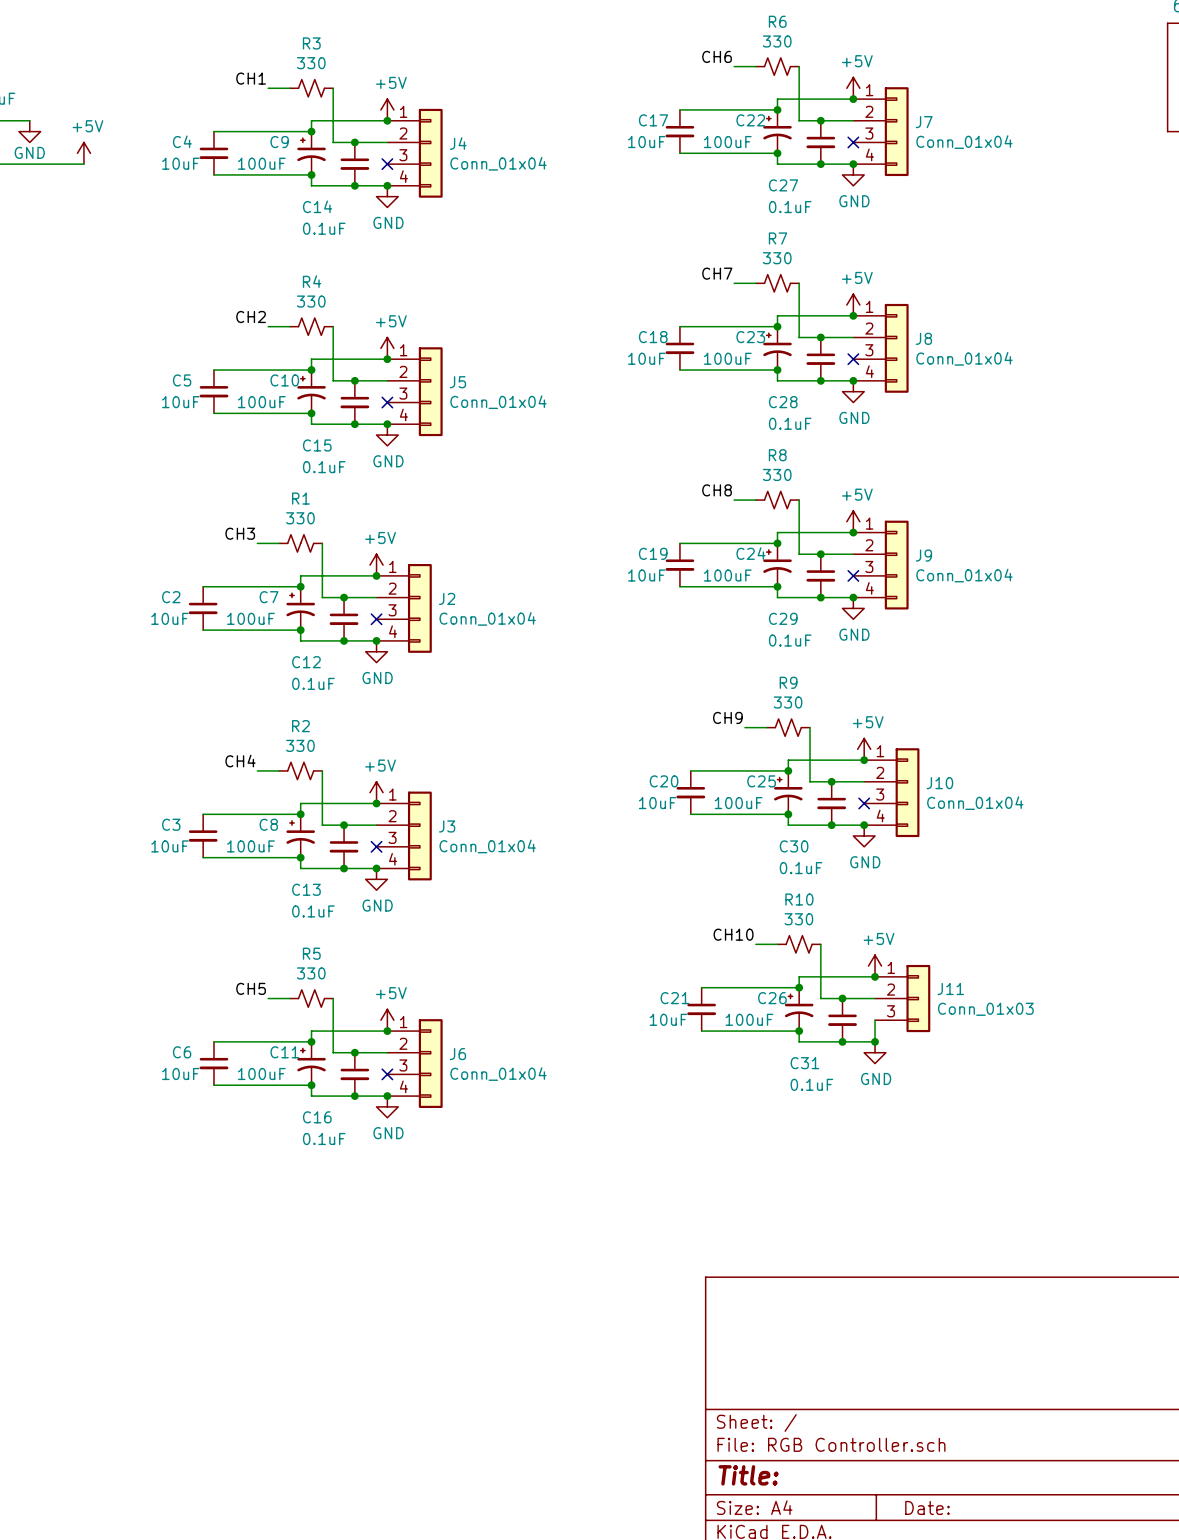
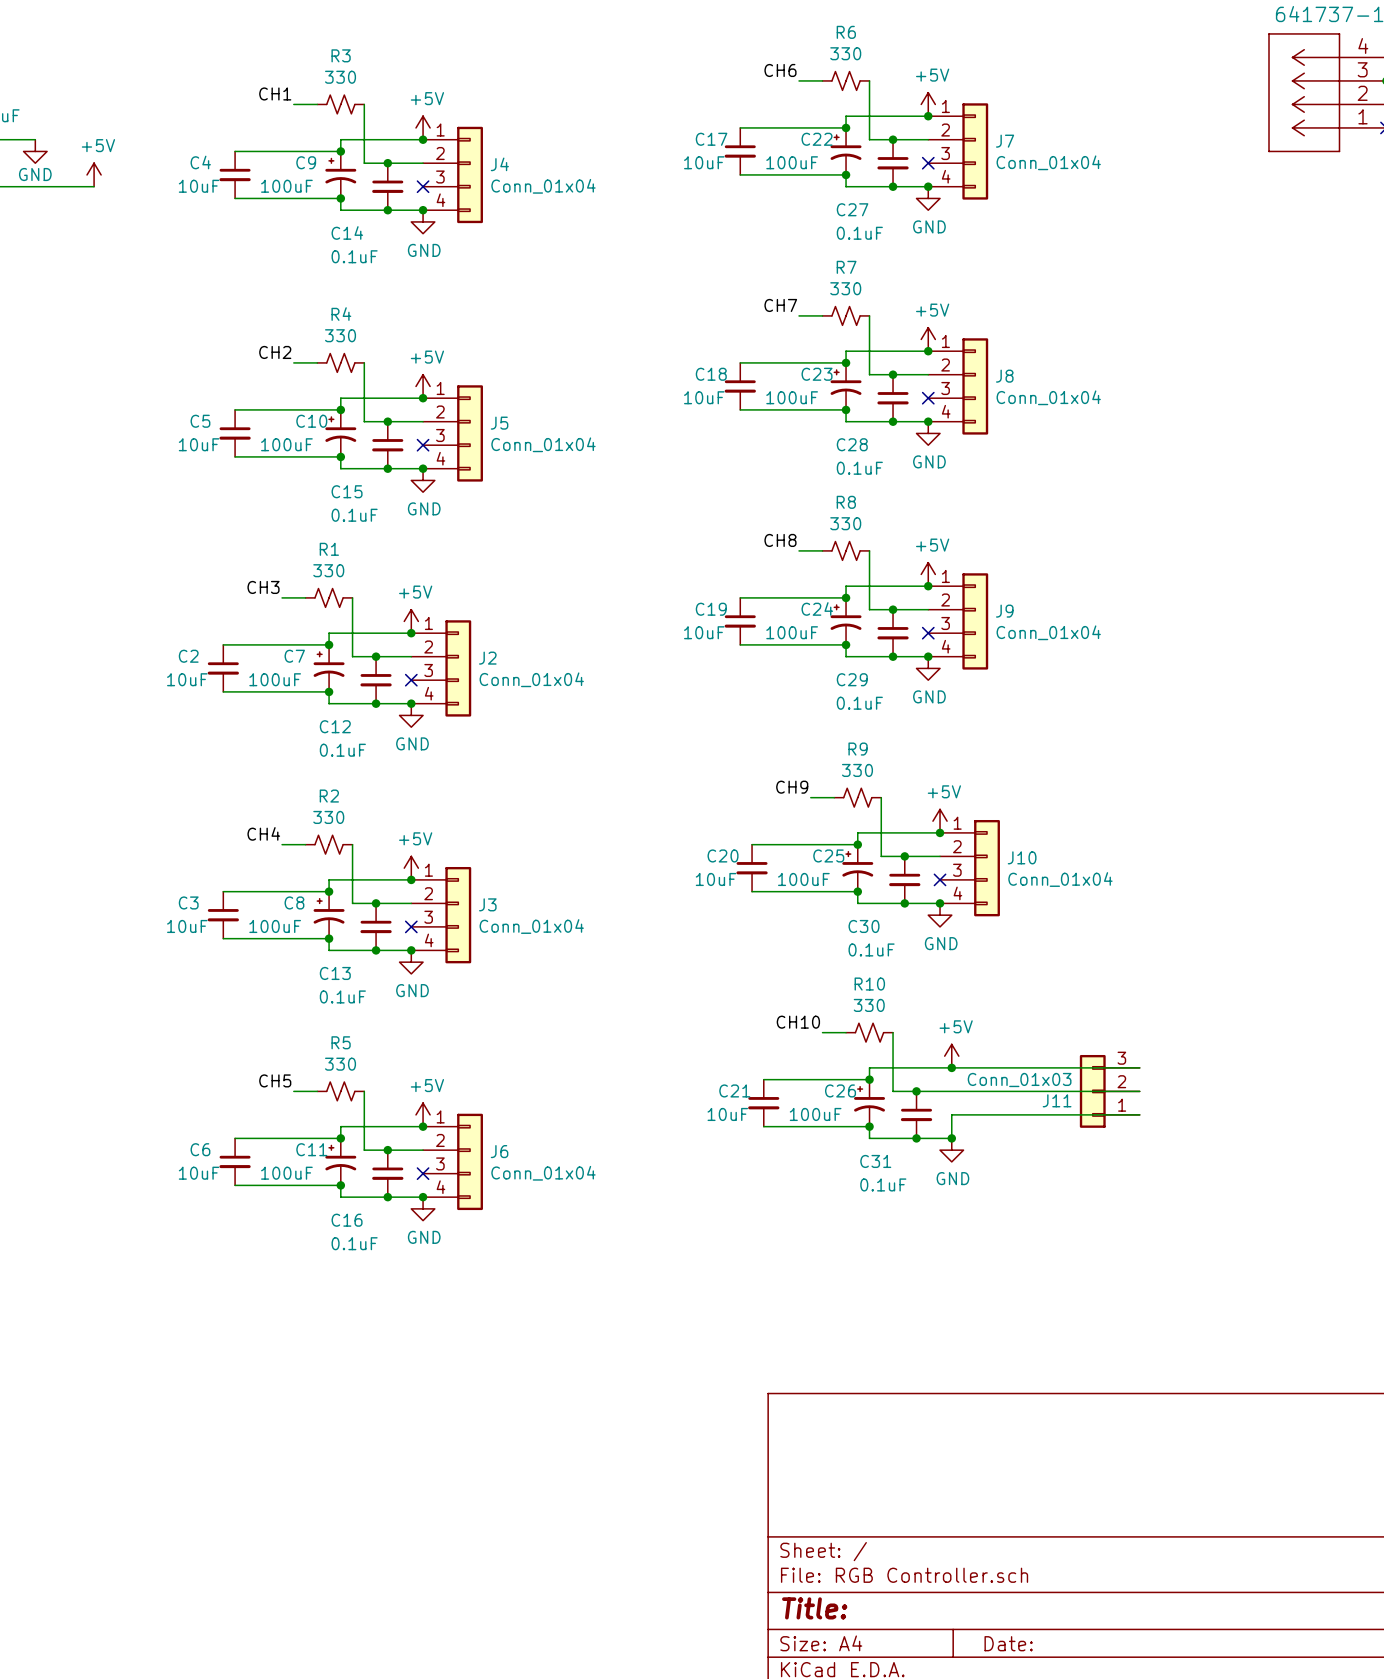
wire: none -> (951, 1067) (1139, 1067)
wire: none -> (951, 1091) (1139, 1091)
J11 position: (902, 998) -> (1109, 1091)
J11 rotation: 0° (918, 998) -> 180° (1092, 1091)
wire: none -> (951, 1114) (1139, 1114)

